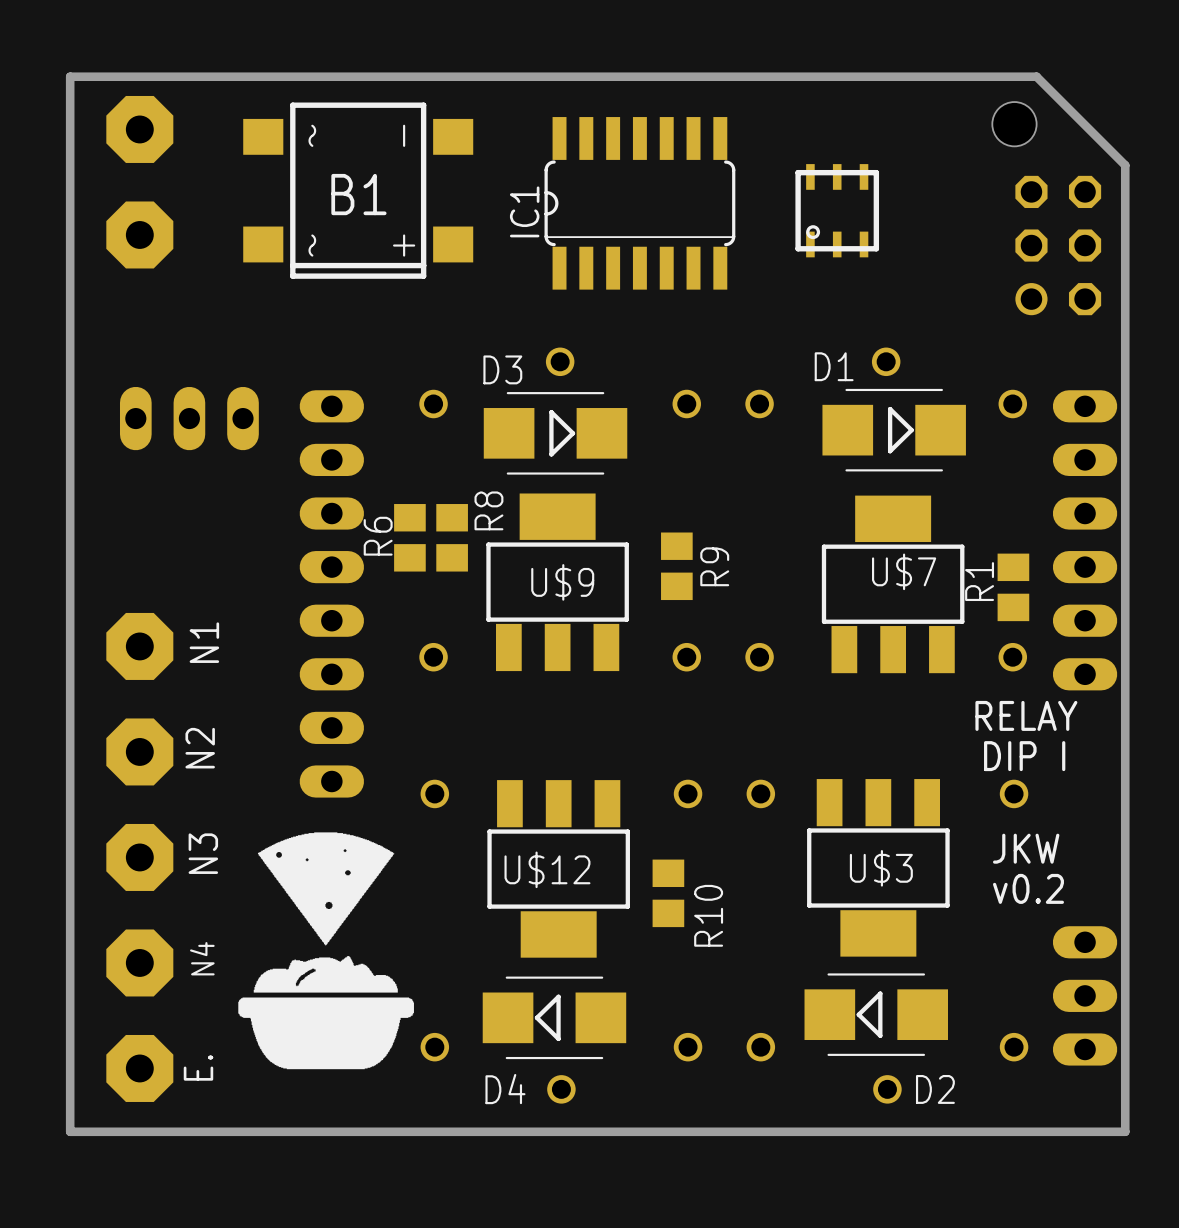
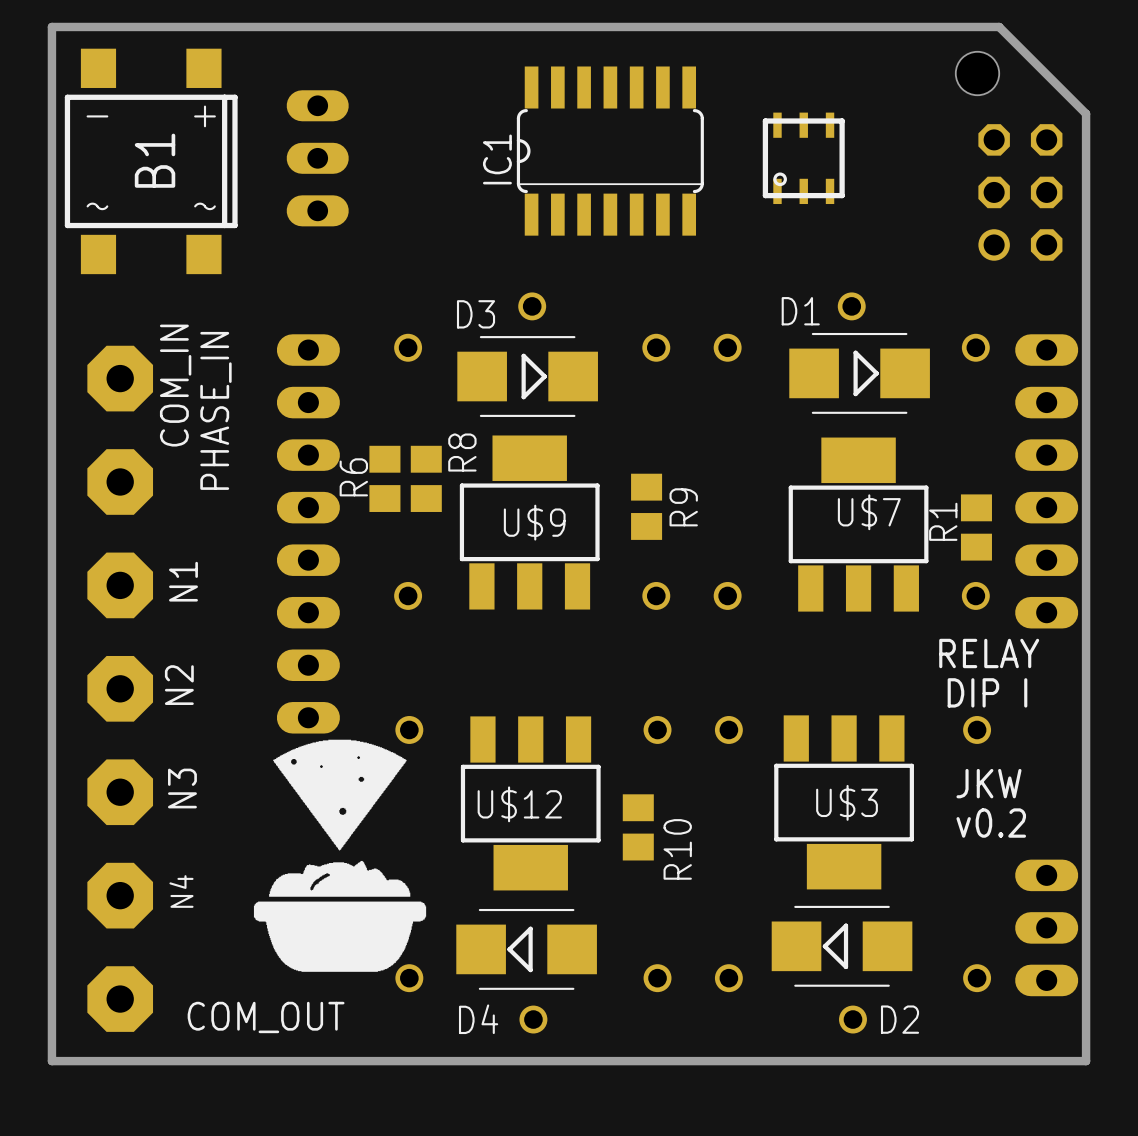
part: (139, 129) -> none
B1 rotation: 0° (358, 190) -> 90° counterclockwise (151, 161)
B1 position: (358, 190) -> (151, 161)
part: (139, 234) -> none
part rotation: 0° (189, 418) -> 90° clockwise (317, 158)
part position: (189, 418) -> (317, 158)
COM_IN: none -> (120, 378)
PHASE_IN: none -> (120, 481)
drawing position: (326, 950) -> (340, 855)
E. name: E. (198, 1067) -> COM_OUT (266, 1017)

